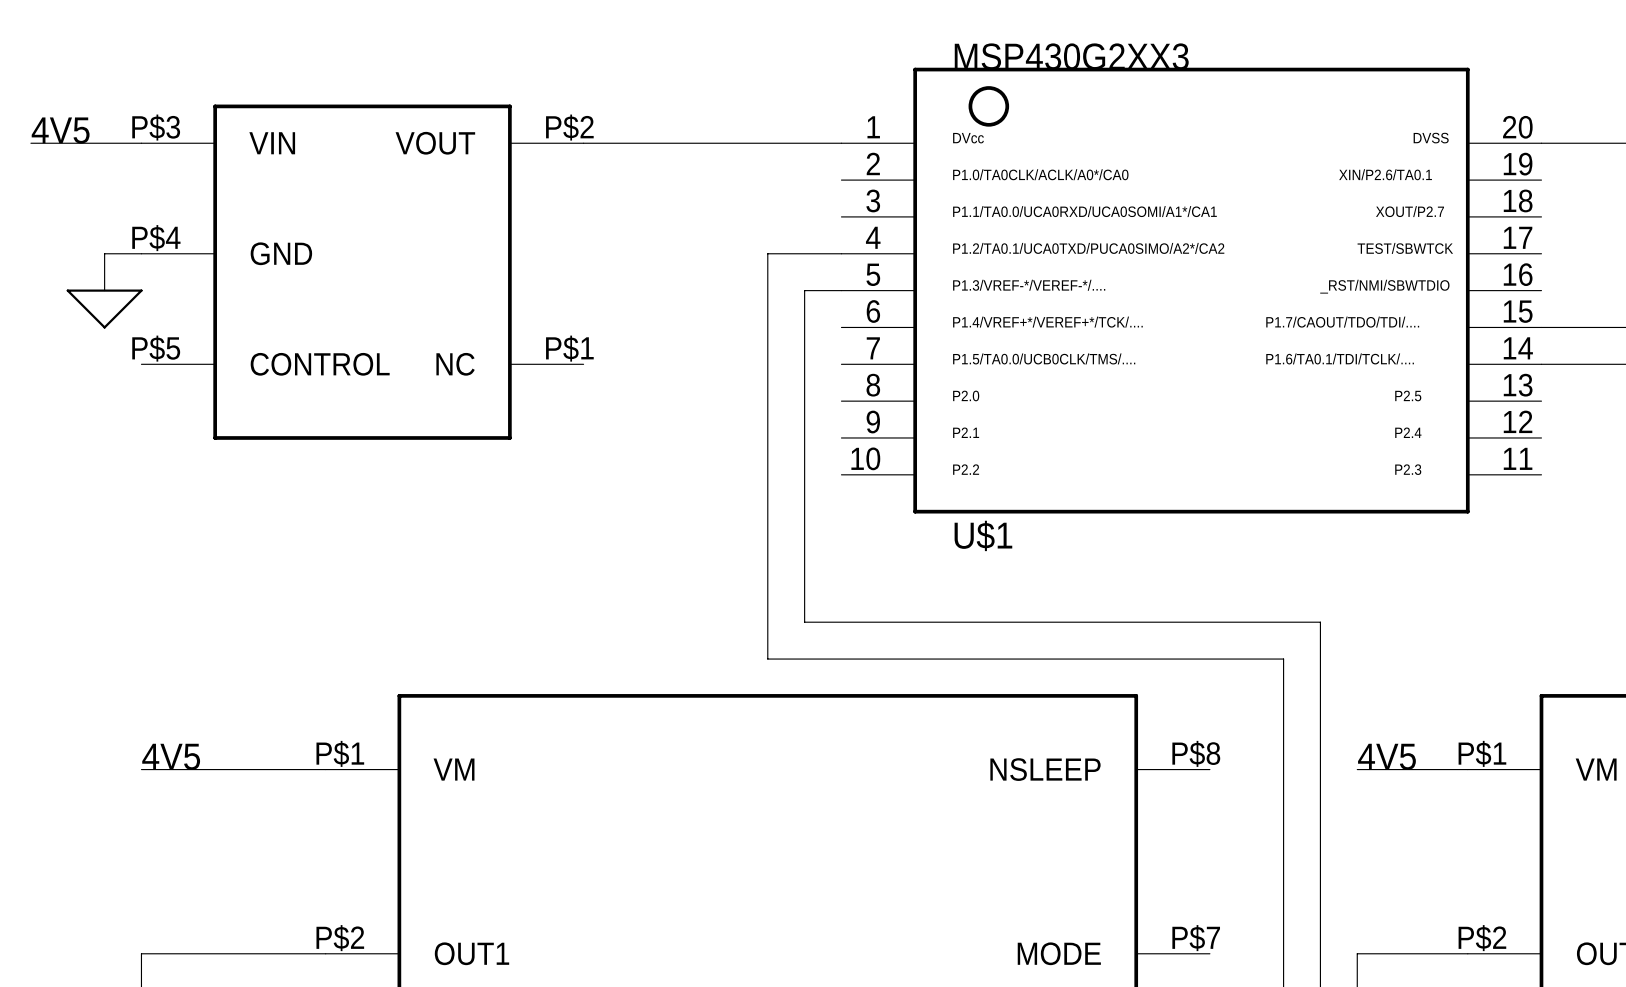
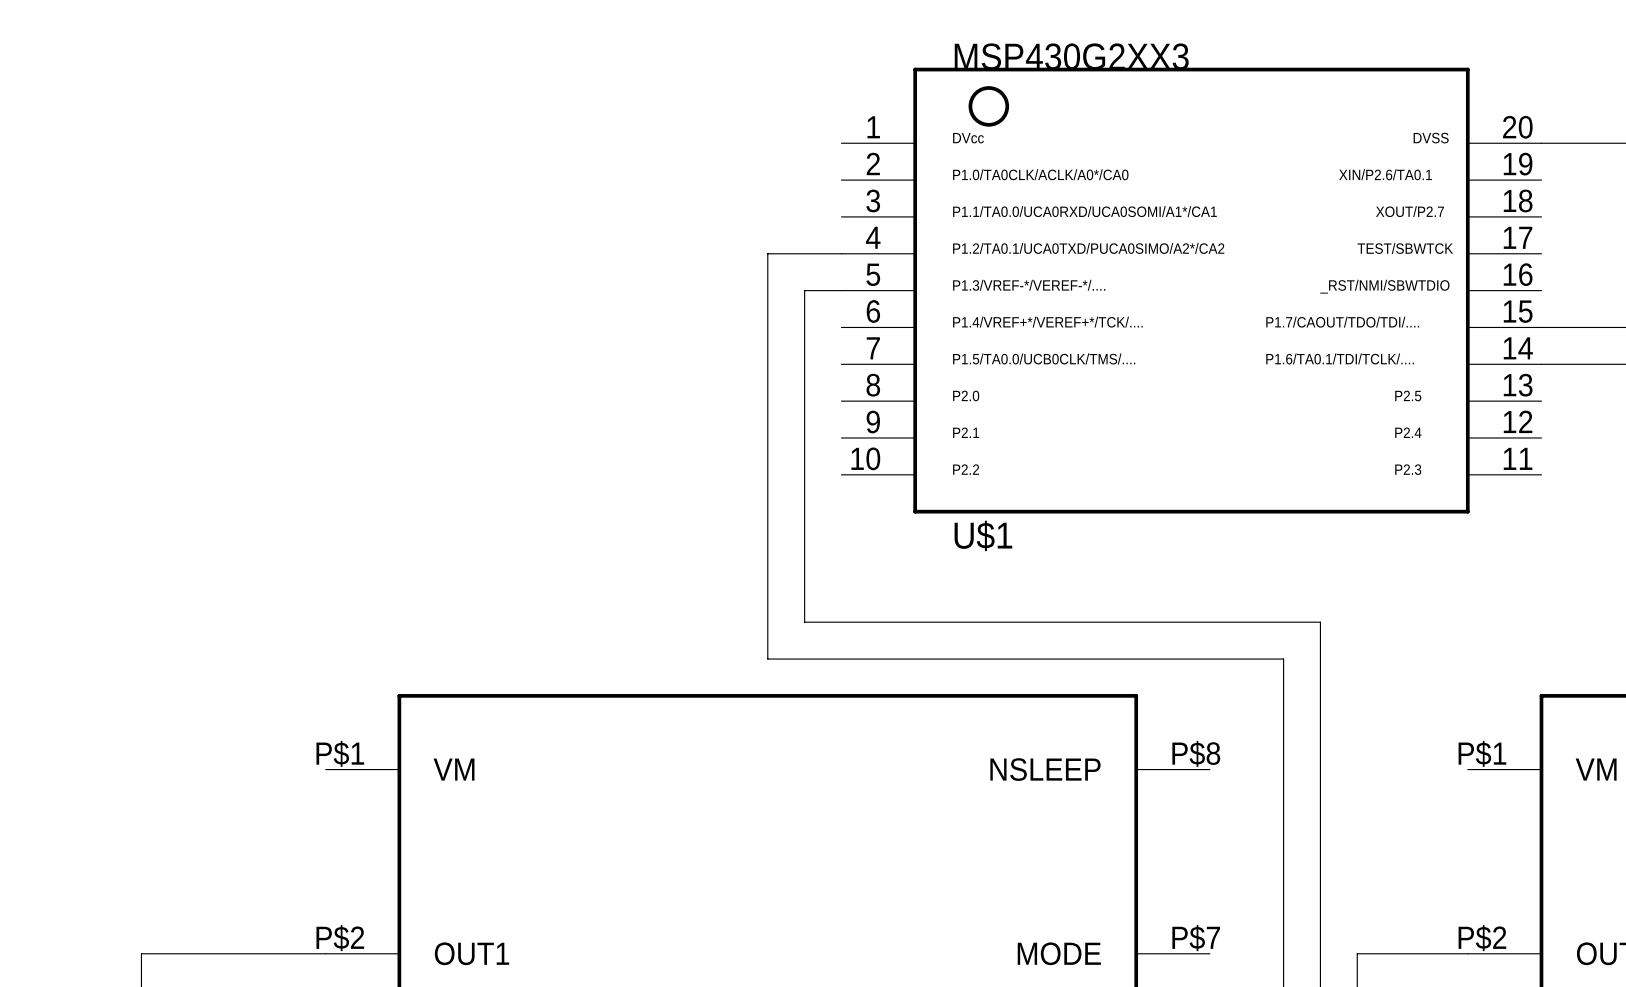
label: 4V5 (60, 130) -> none
wire: (30, 143) (141, 143) -> none
wire: (583, 143) (841, 143) -> none
wire: (141, 253) (104, 253) (104, 290) -> none
part: (362, 272) -> none
power symbol: (104, 309) -> none
label: 4V5 (171, 756) -> none
label: 4V5 (1386, 756) -> none
wire: (141, 769) (325, 769) -> none
wire: (1357, 769) (1467, 769) -> none

